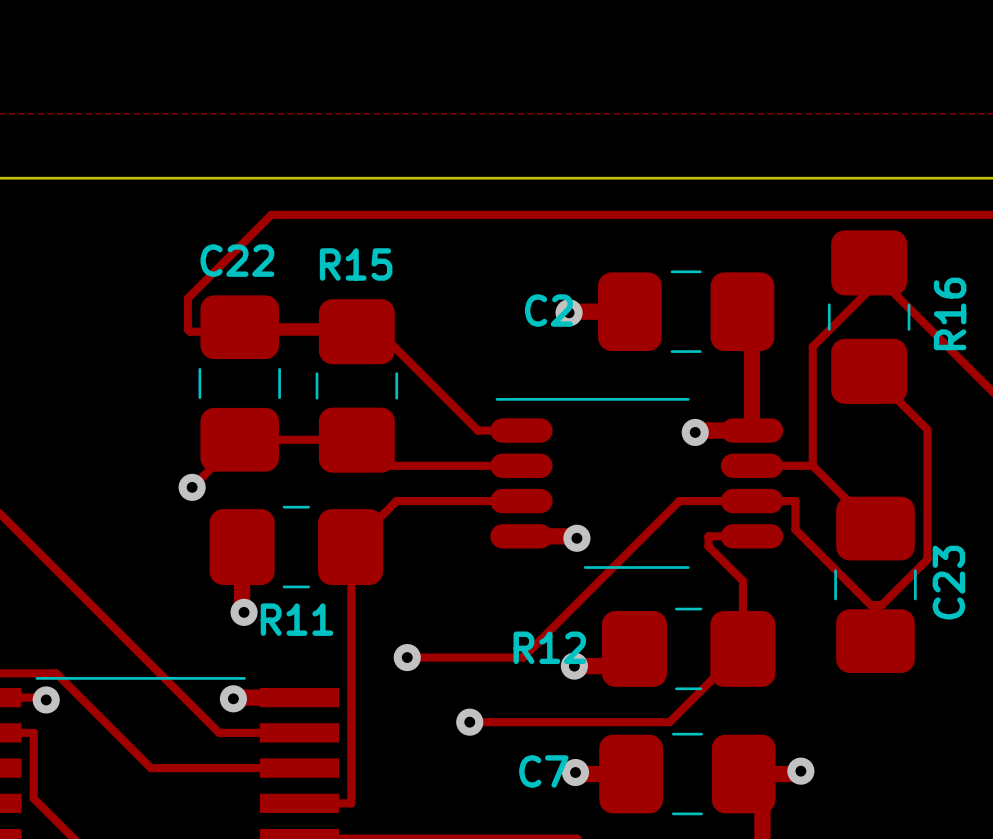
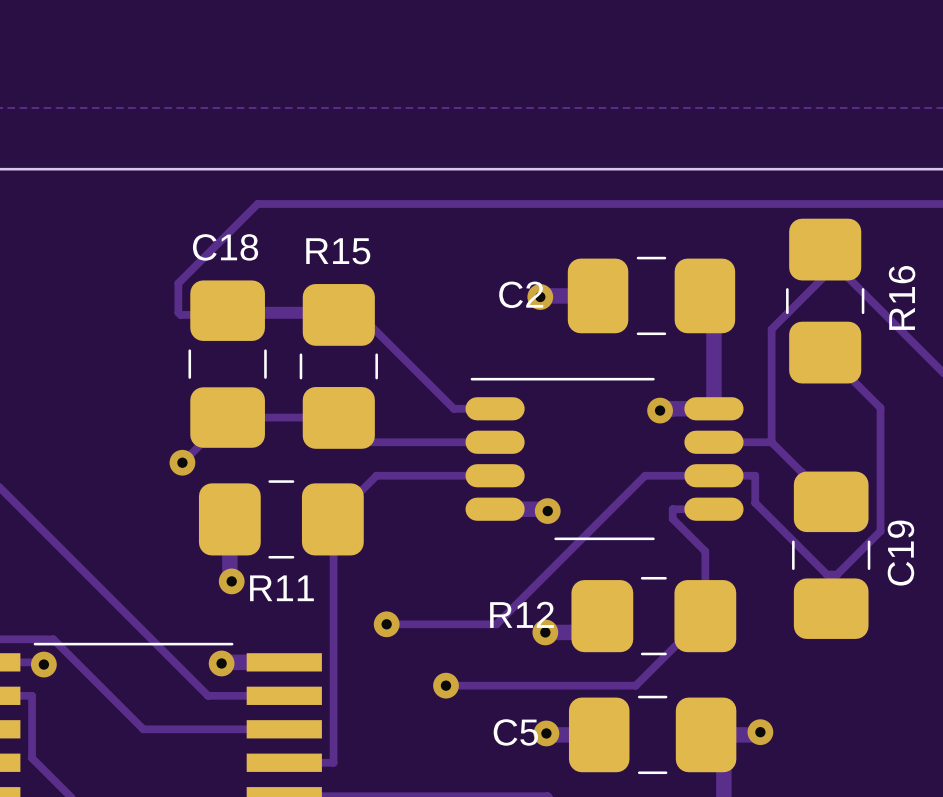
C22 name: C22 (237, 260) -> C18 (225, 247)
C23 name: C23 (948, 582) -> C19 (900, 553)
C7 name: C7 (543, 771) -> C5 (515, 732)

